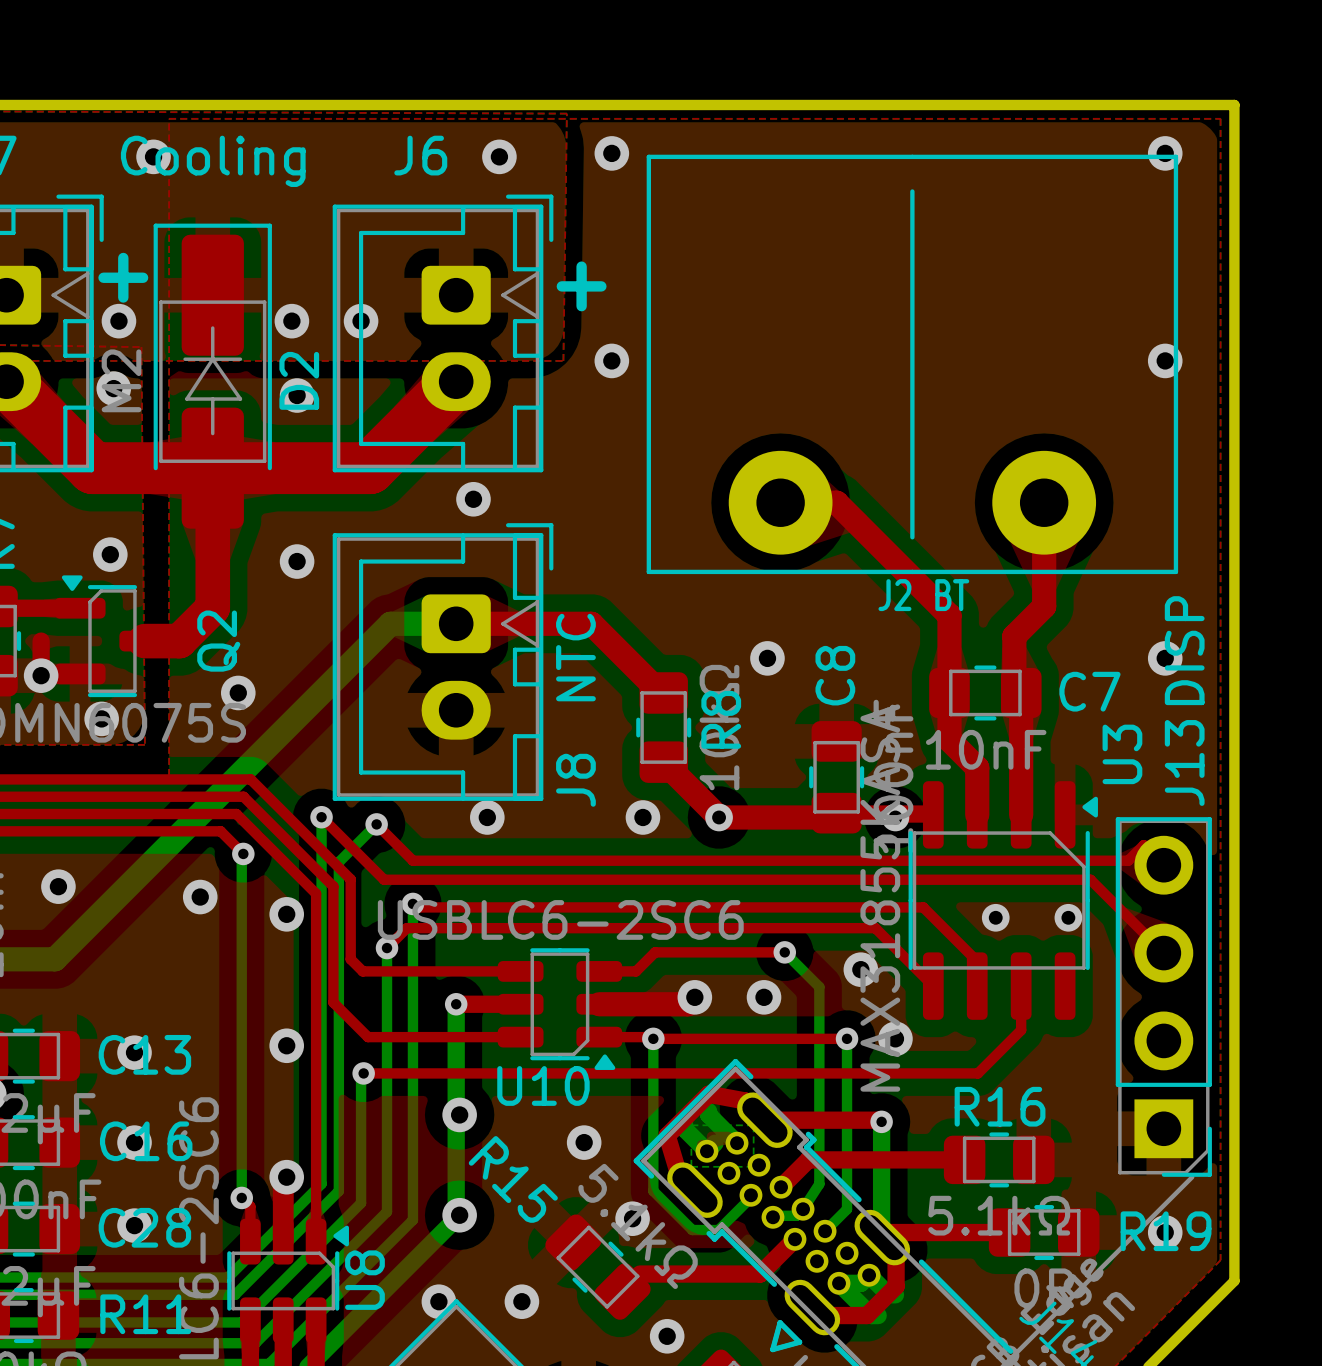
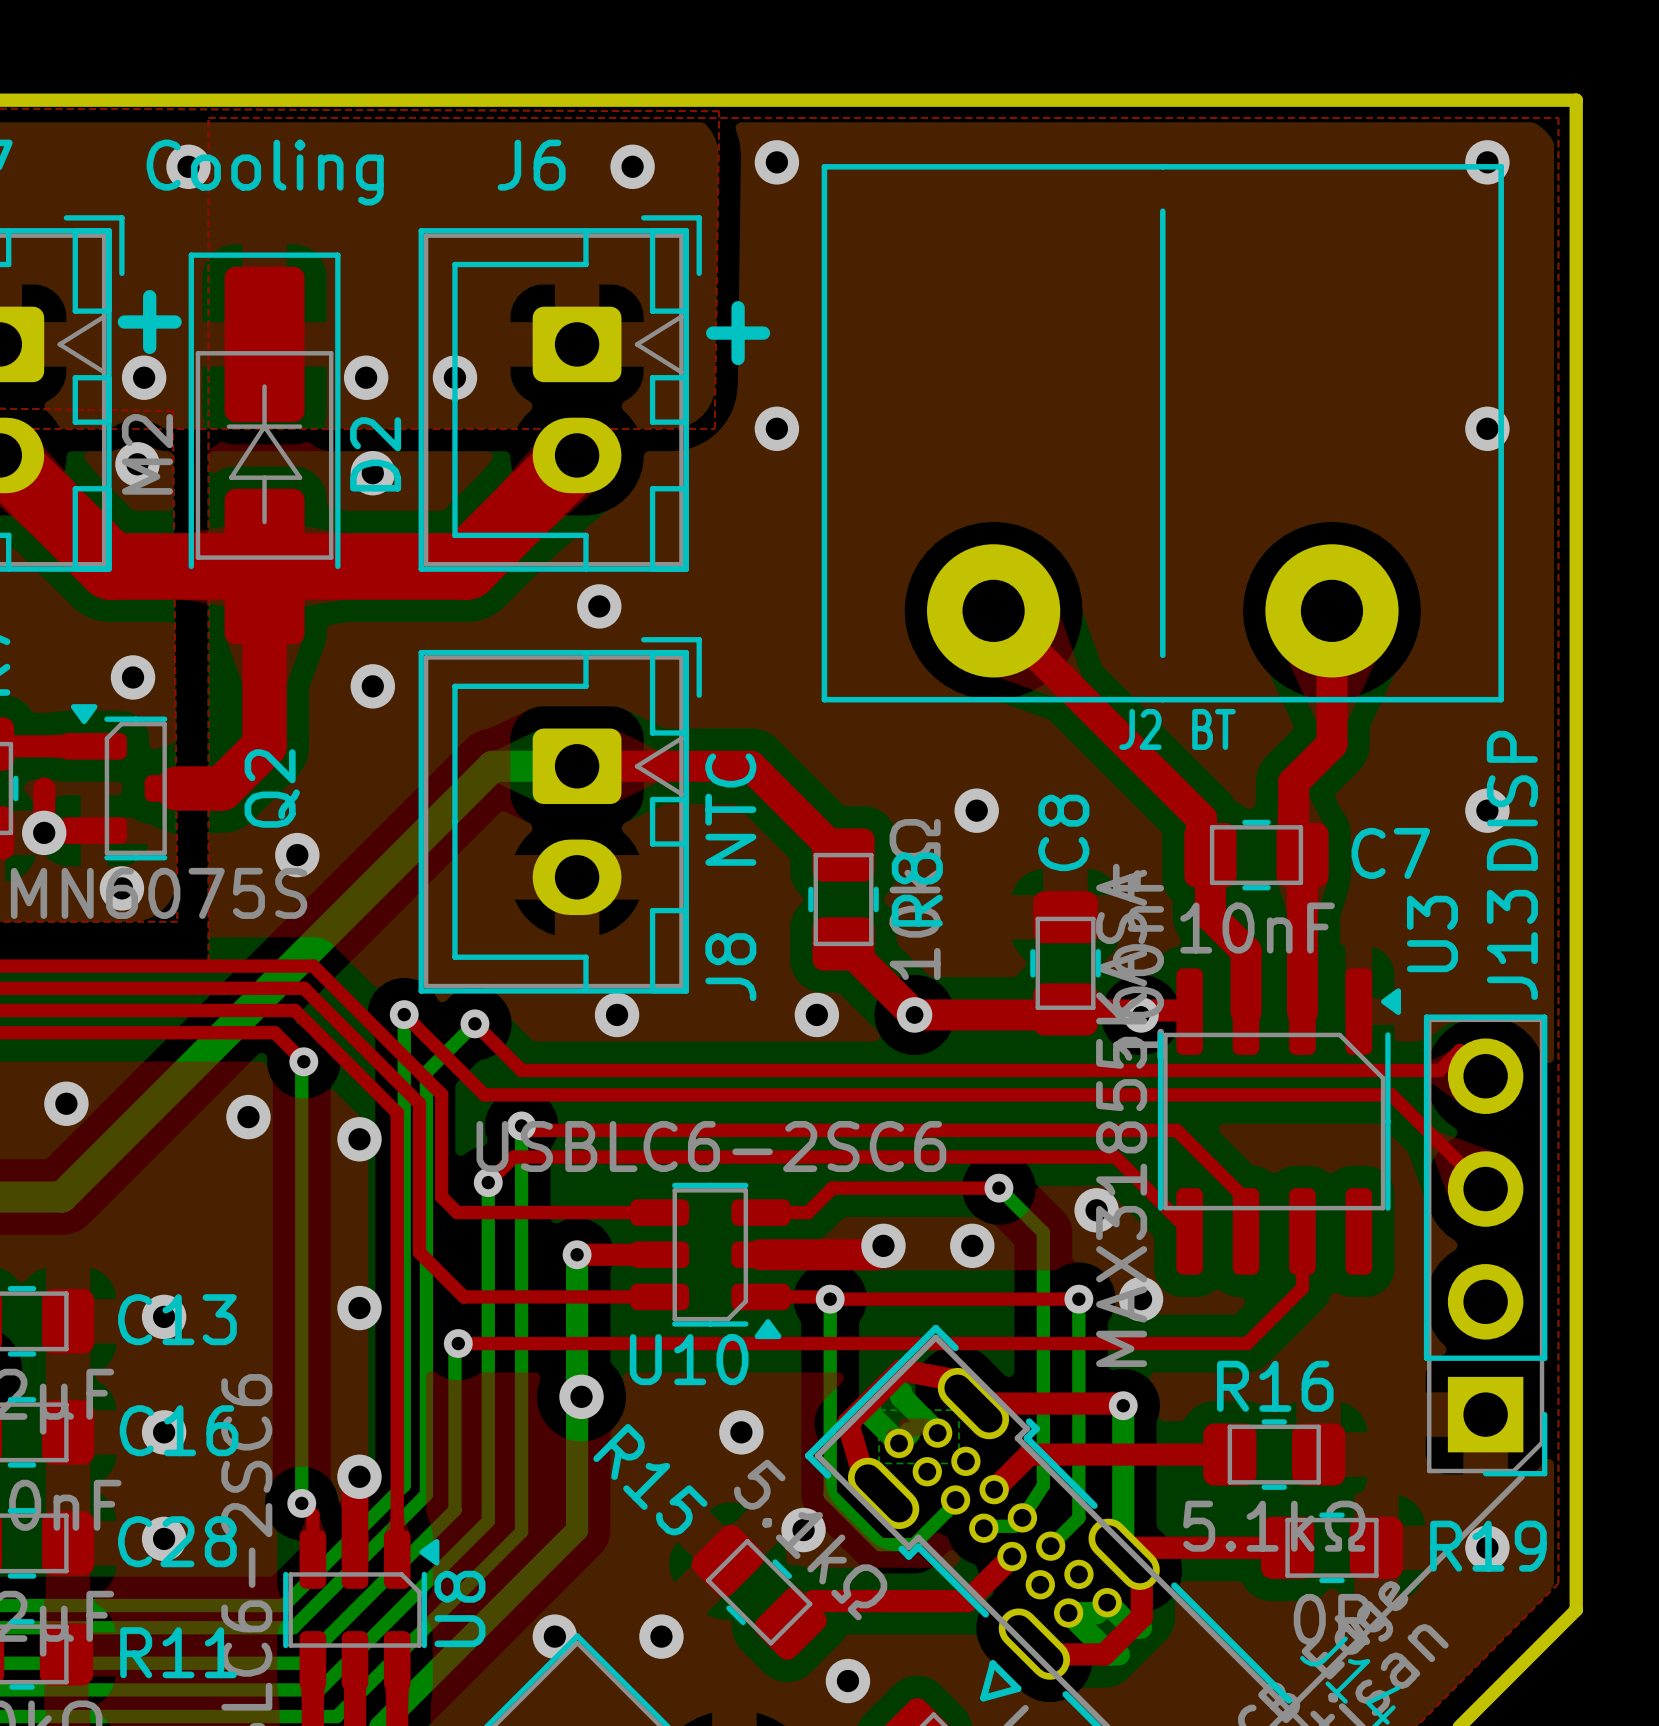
top track: (780, 502) (836, 502) (949, 615) (949, 692) -> (993, 610) (1201, 818) (1201, 855)
via: (995, 917) -> none
via: (1068, 917) -> none
via: (459, 1215) -> none

